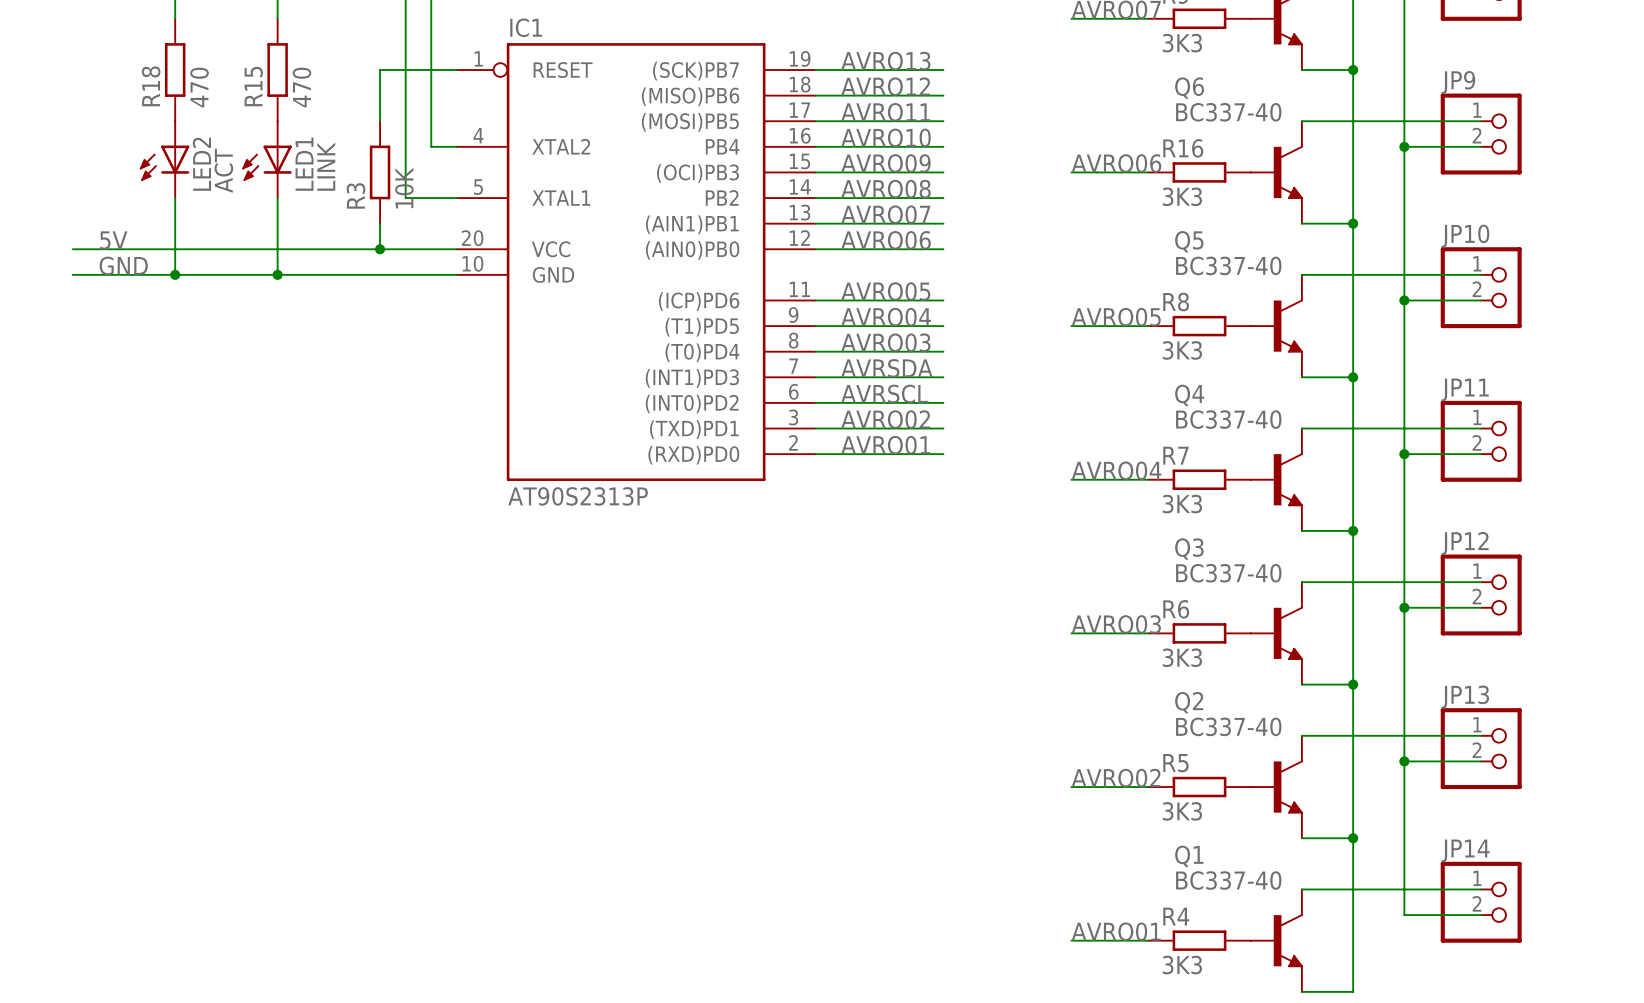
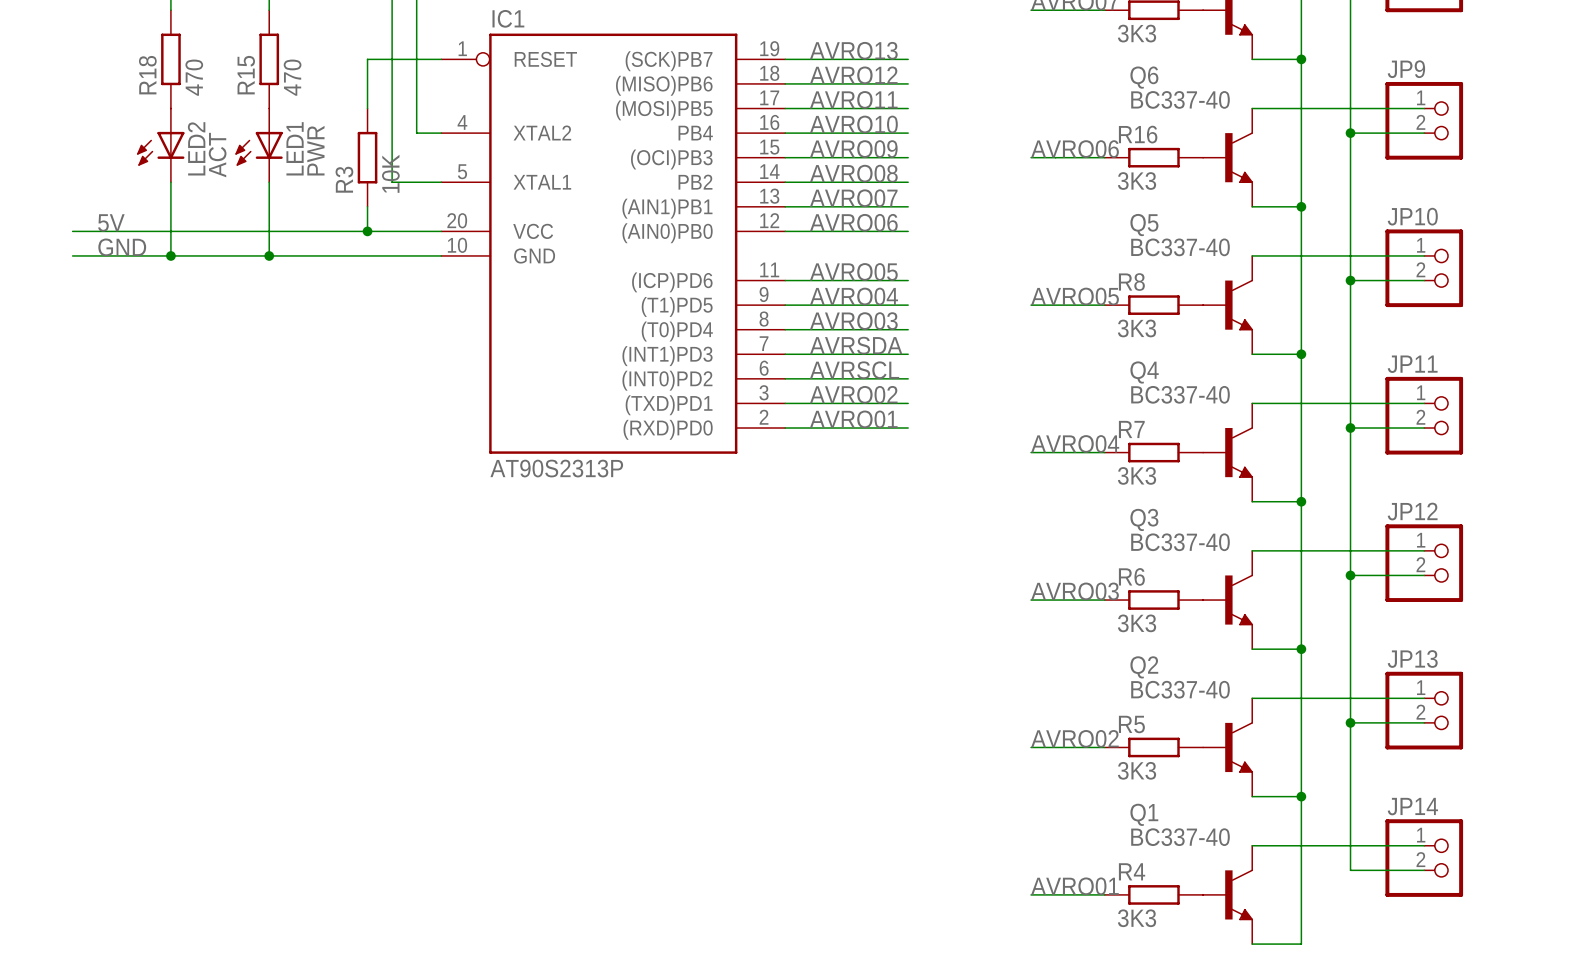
LED1 value: LINK (326, 166) -> PWR (315, 150)

